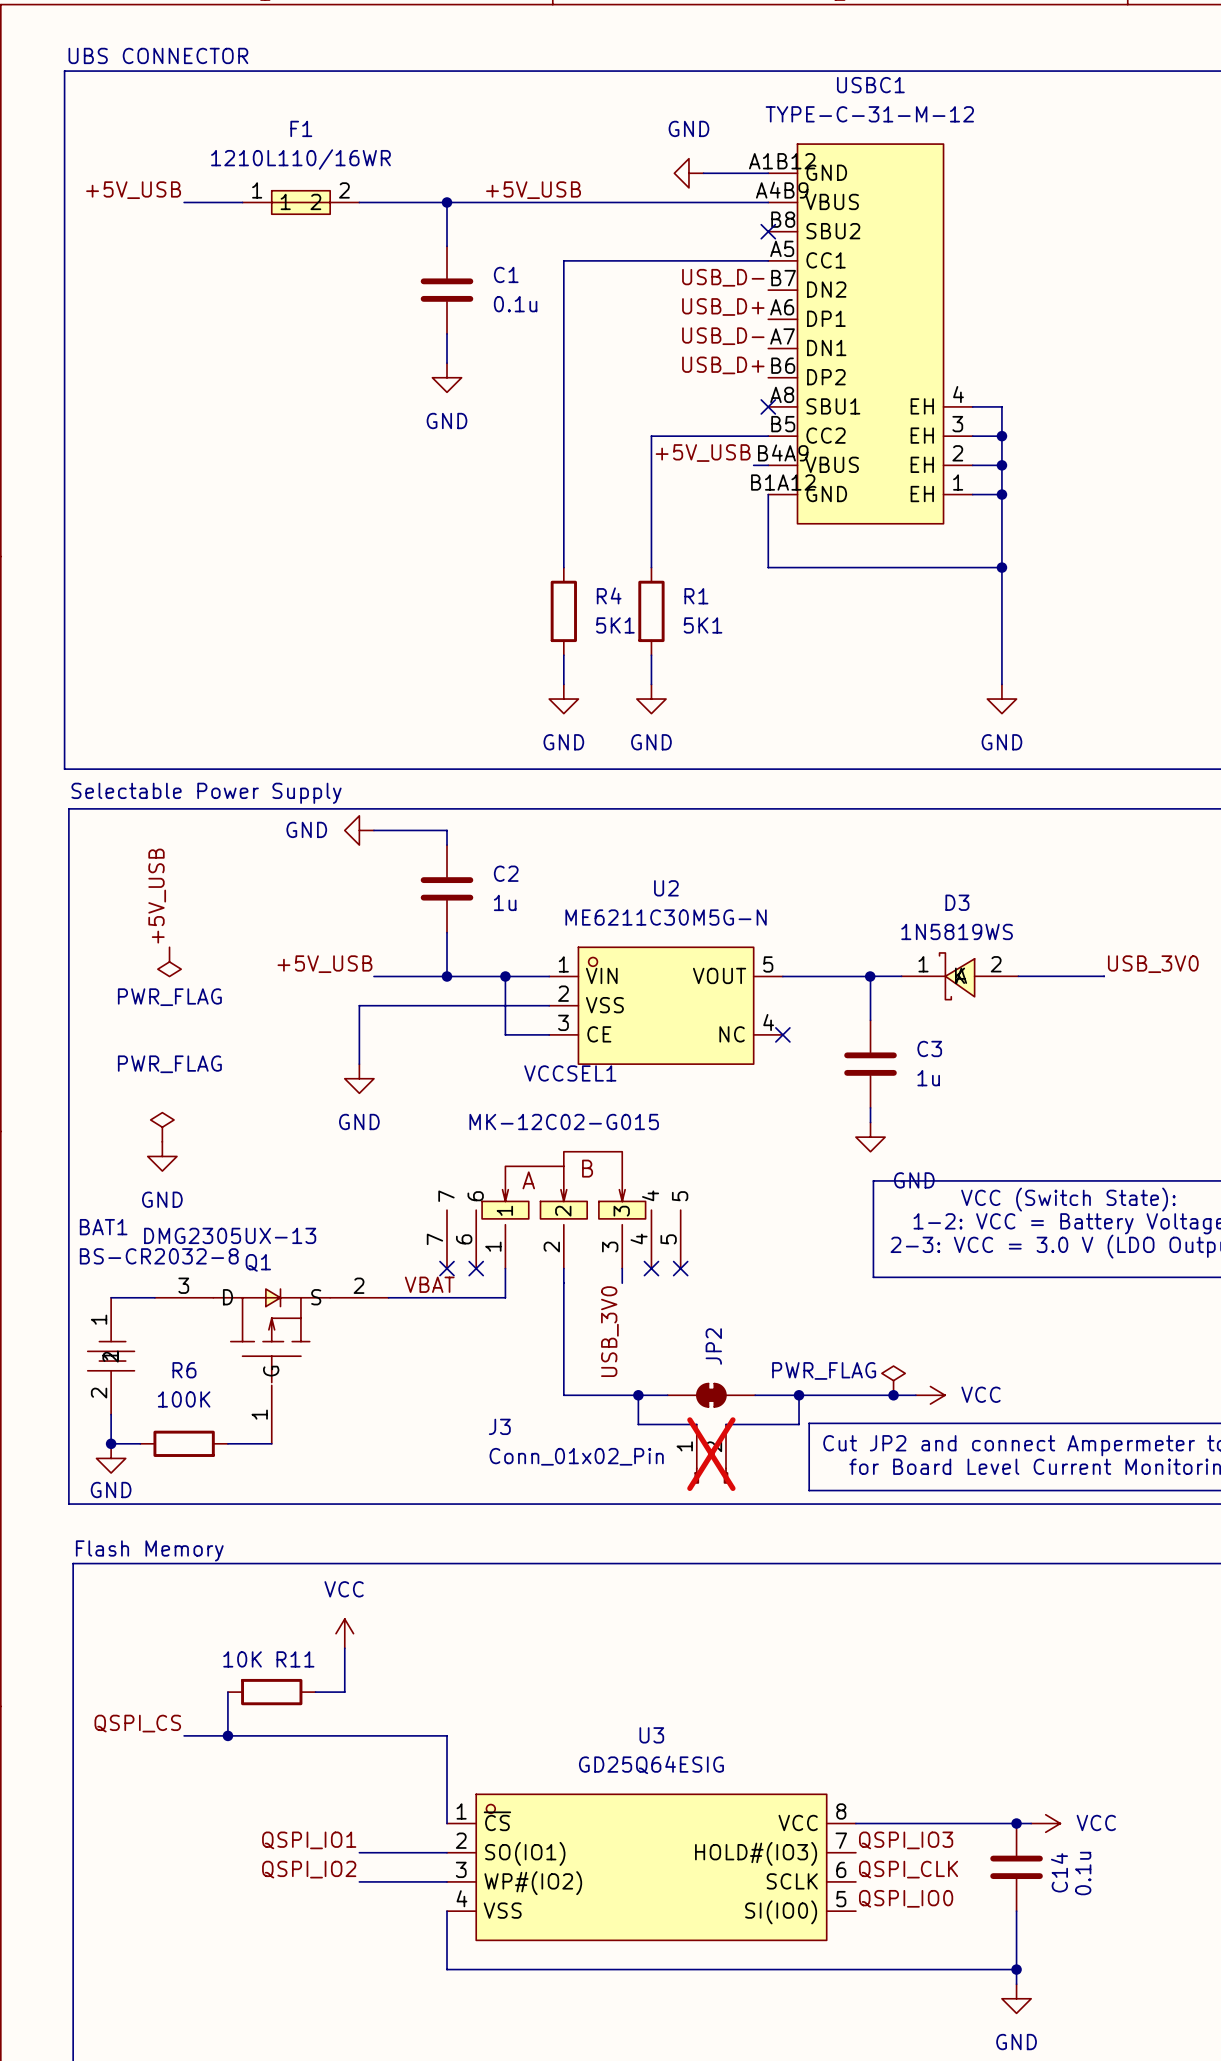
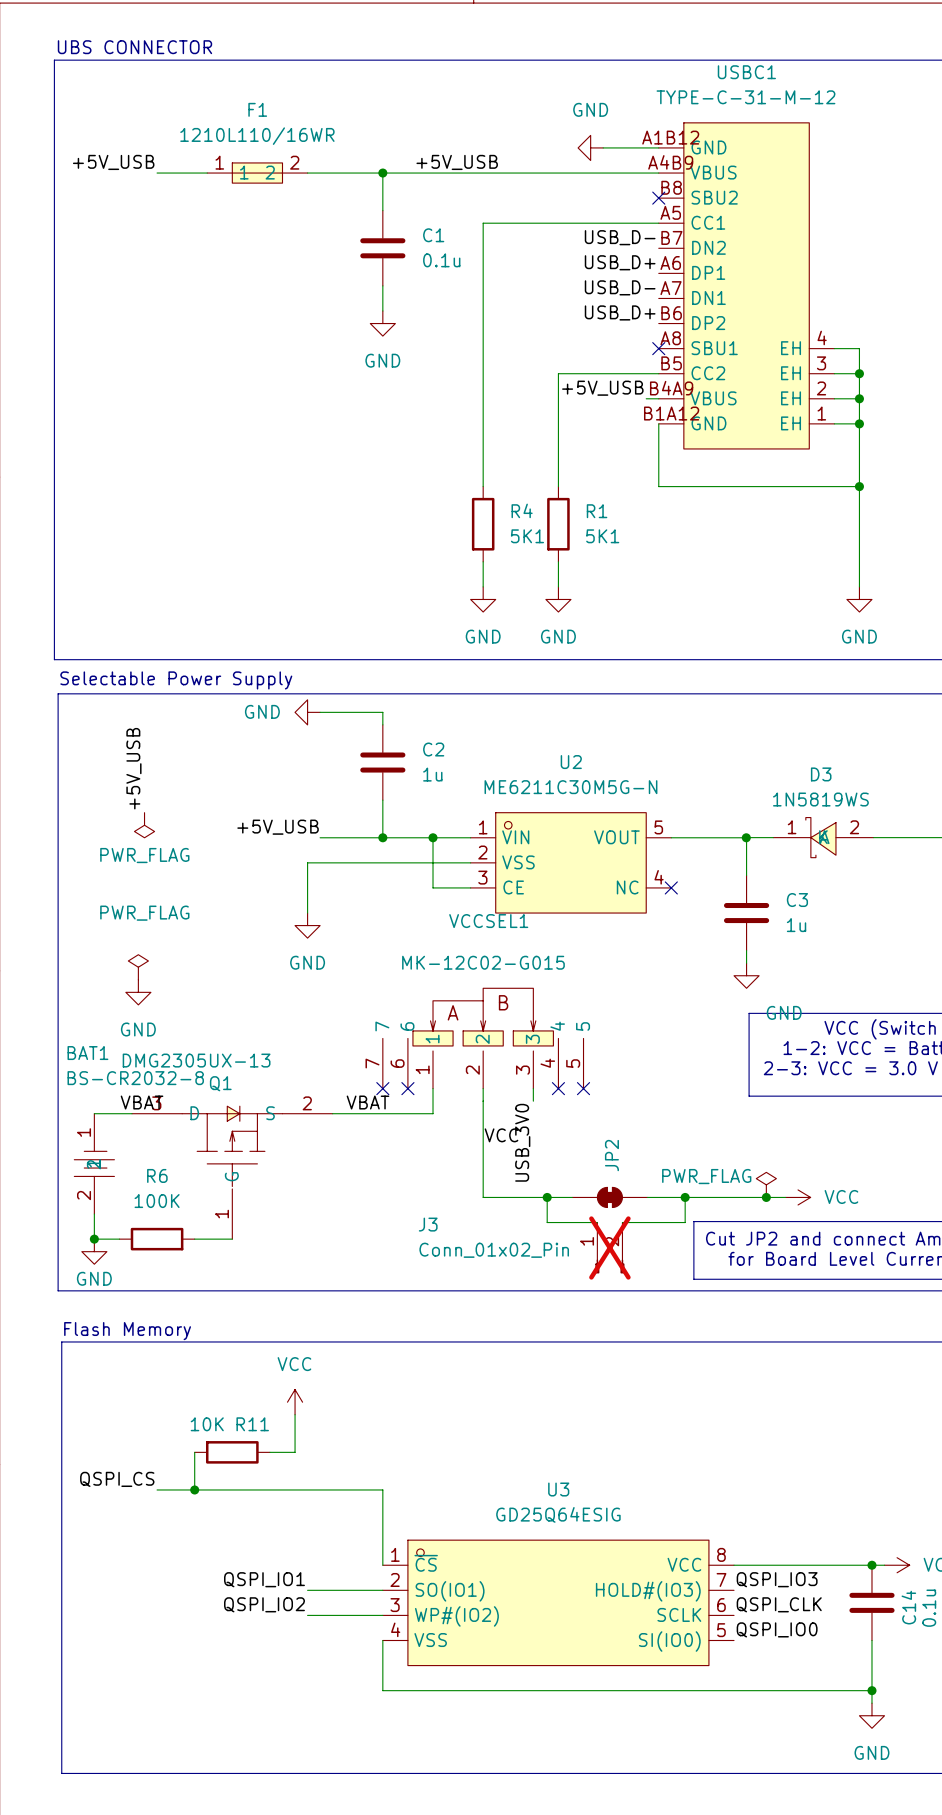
label: none -> VBAT (142, 1102)
label: none -> VCC (501, 1135)

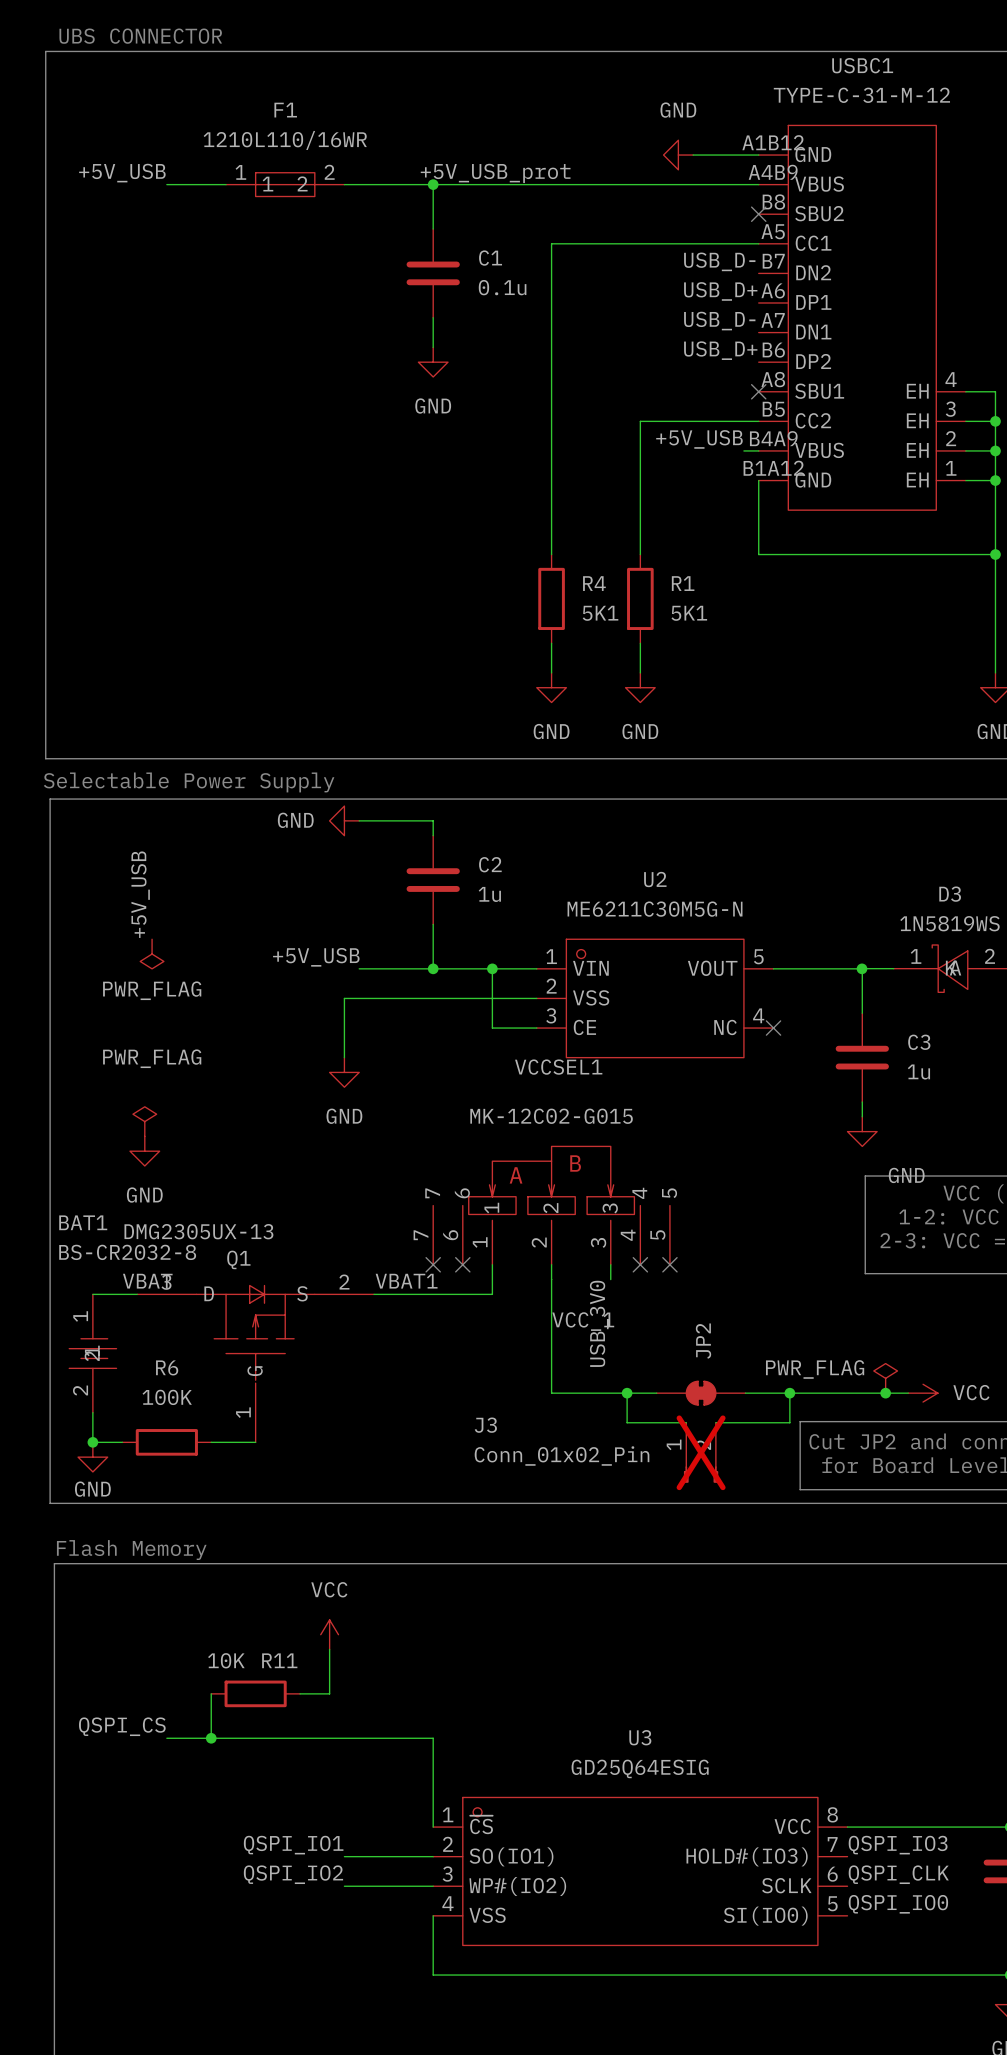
label: +5V_USB (457, 162) -> +5V_USB_prot (495, 173)
label: VBAT (368, 1102) -> VBAT1 (406, 1281)
label: VCC (501, 1135) -> VCC_1 (583, 1321)

